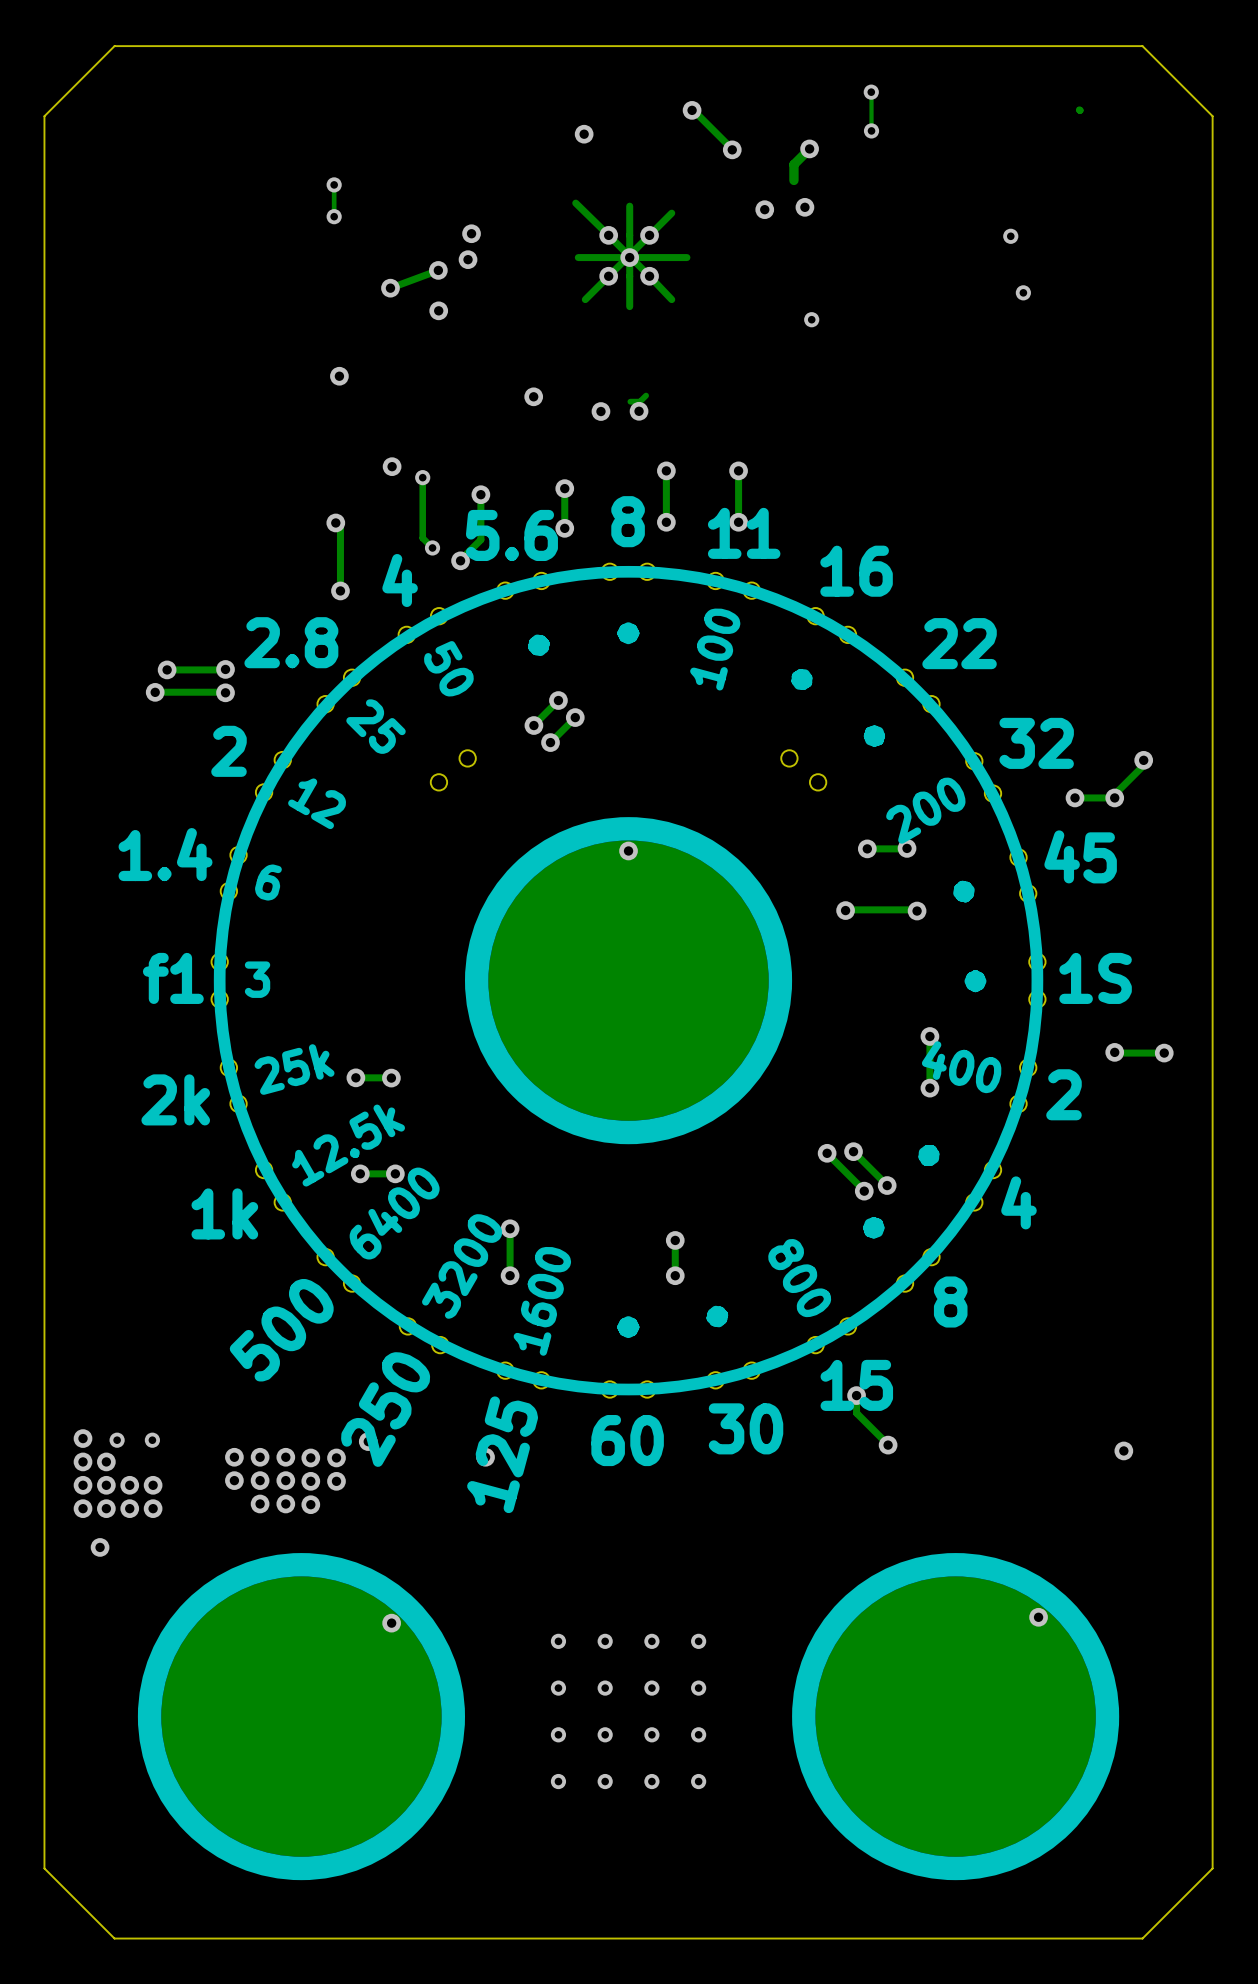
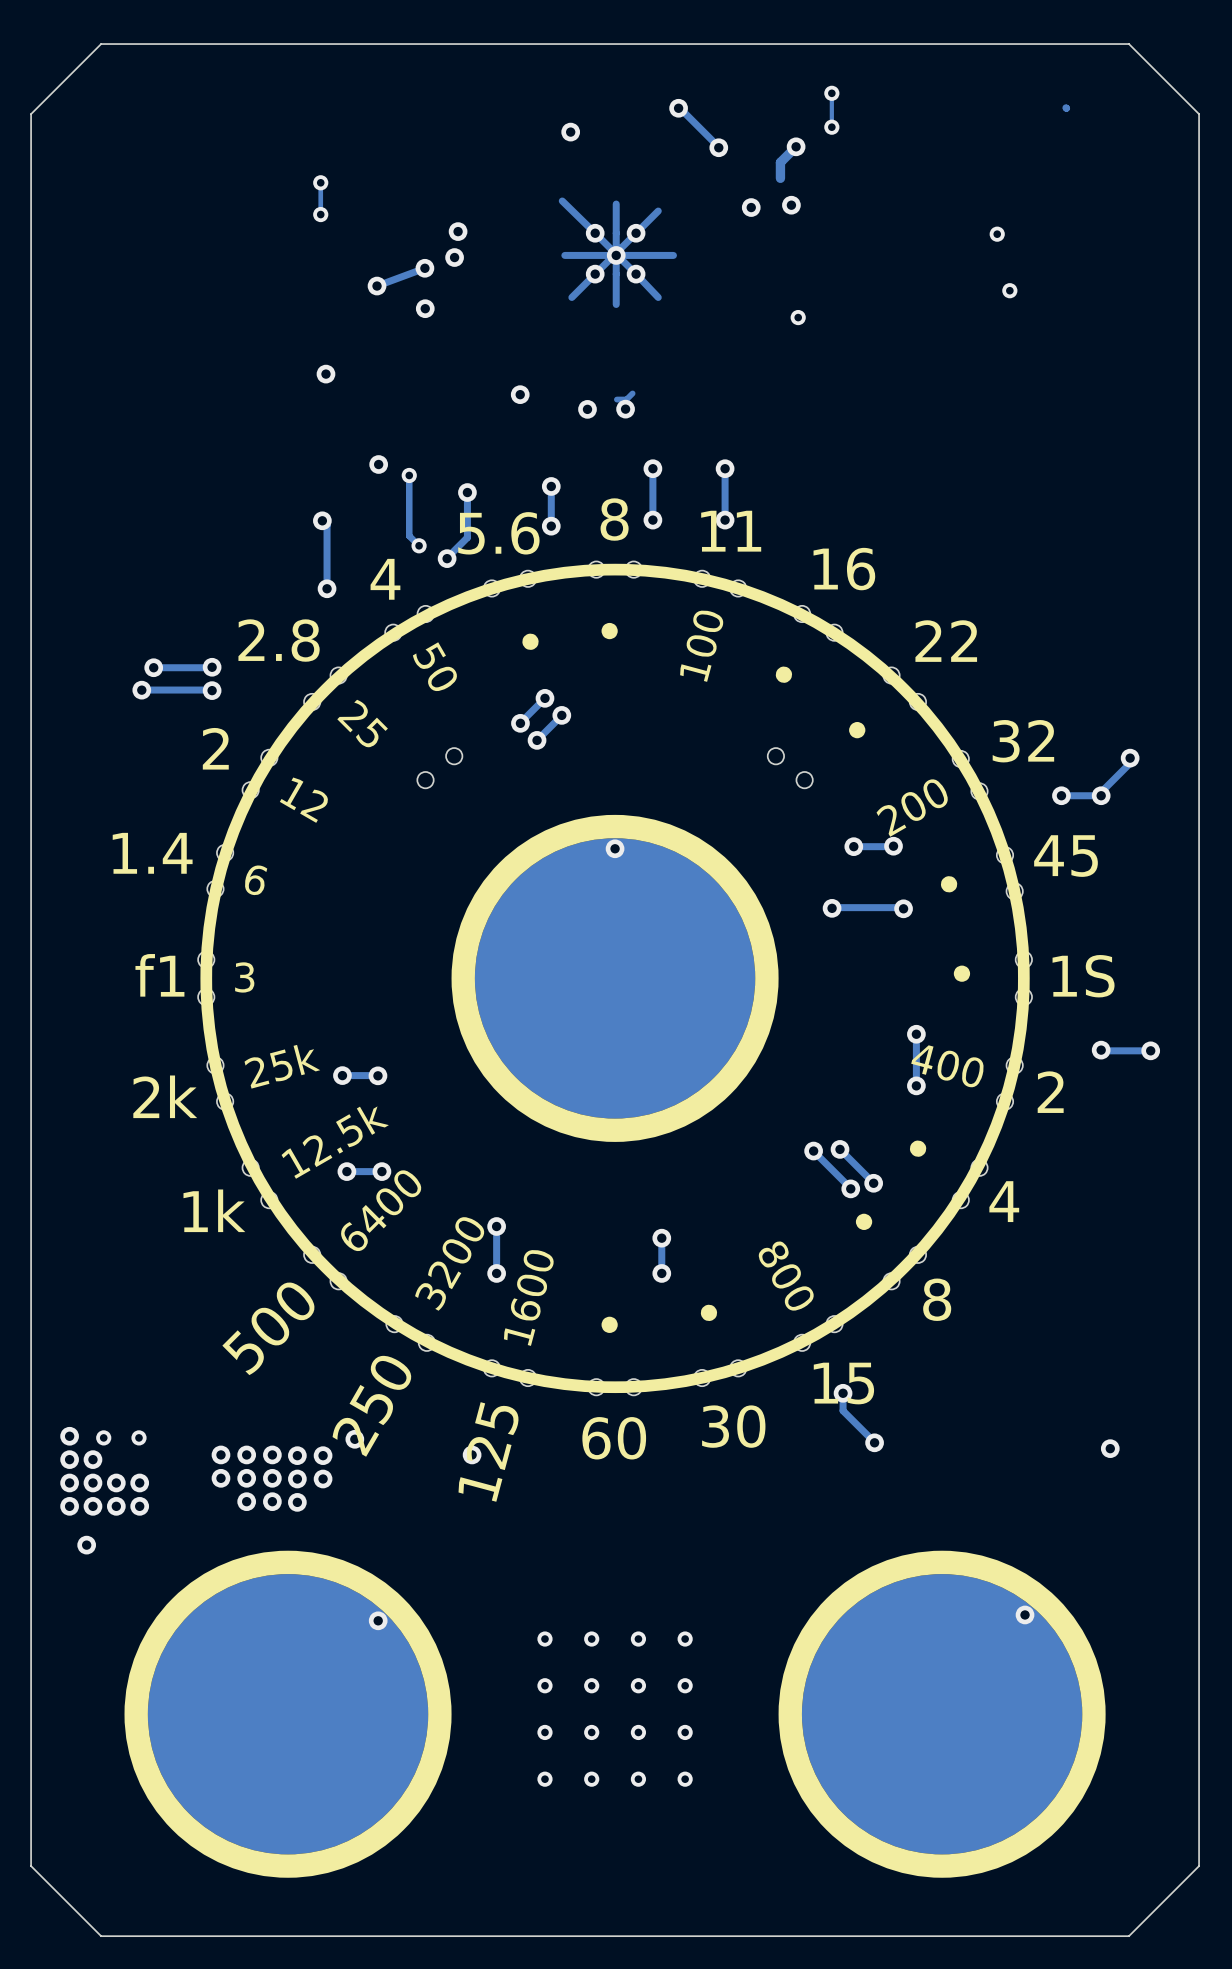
track: (871, 92) (871, 130) -> none
via: (871, 92) -> none
track: none -> (831, 93) (831, 127)
via: none -> (831, 93)
via: none -> (831, 127)
via: (871, 130) -> none

